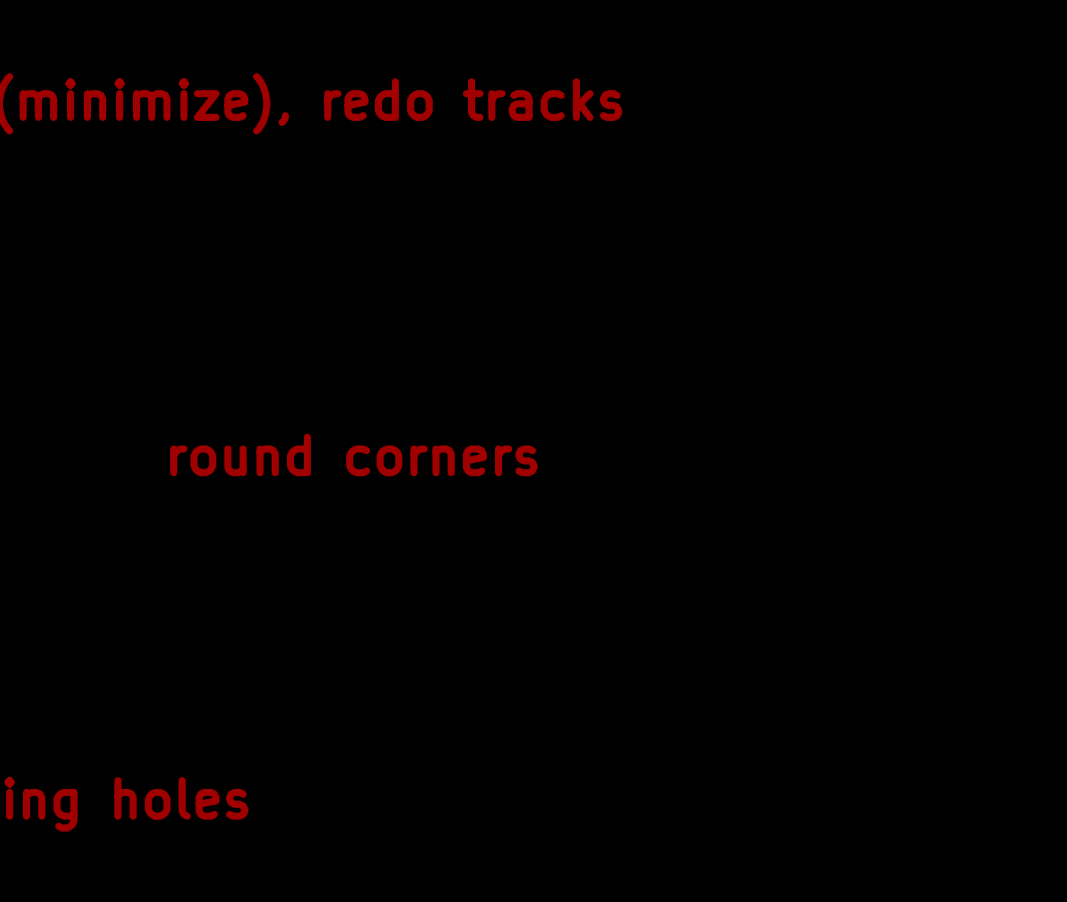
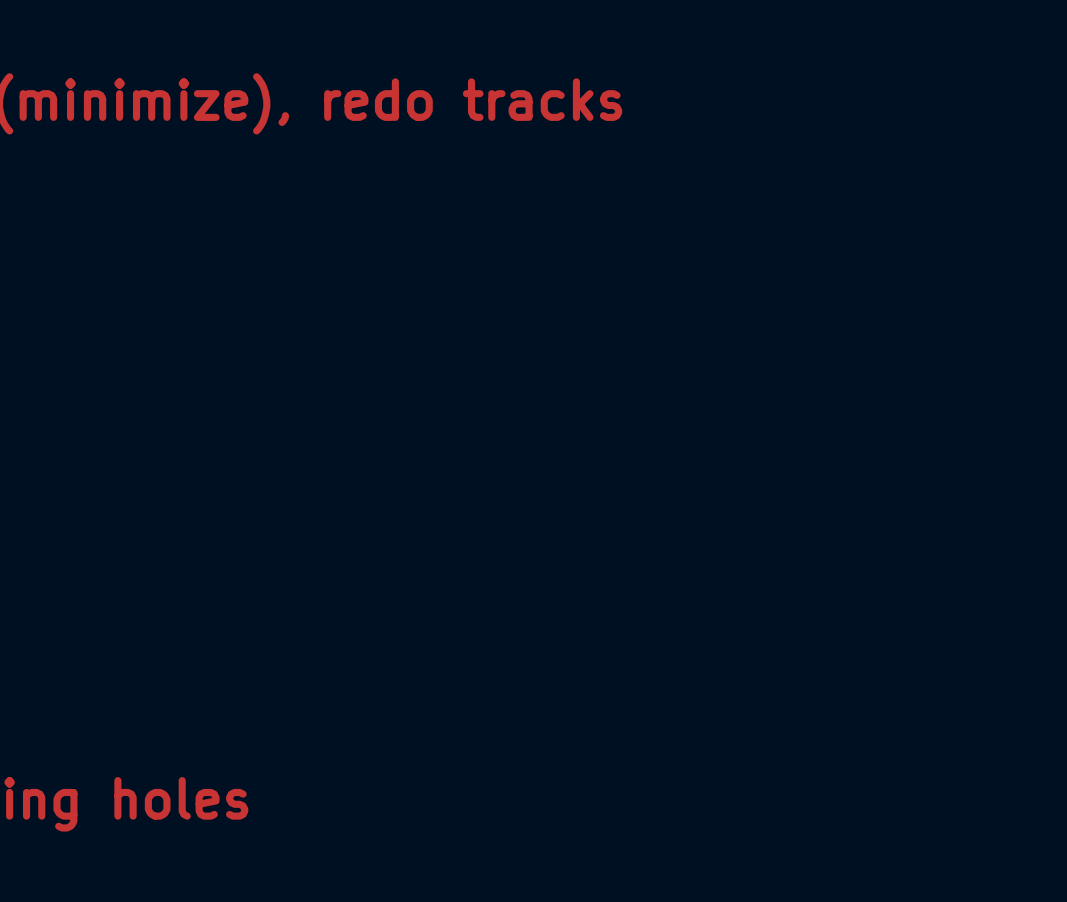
text: round corners (353, 454) -> none

